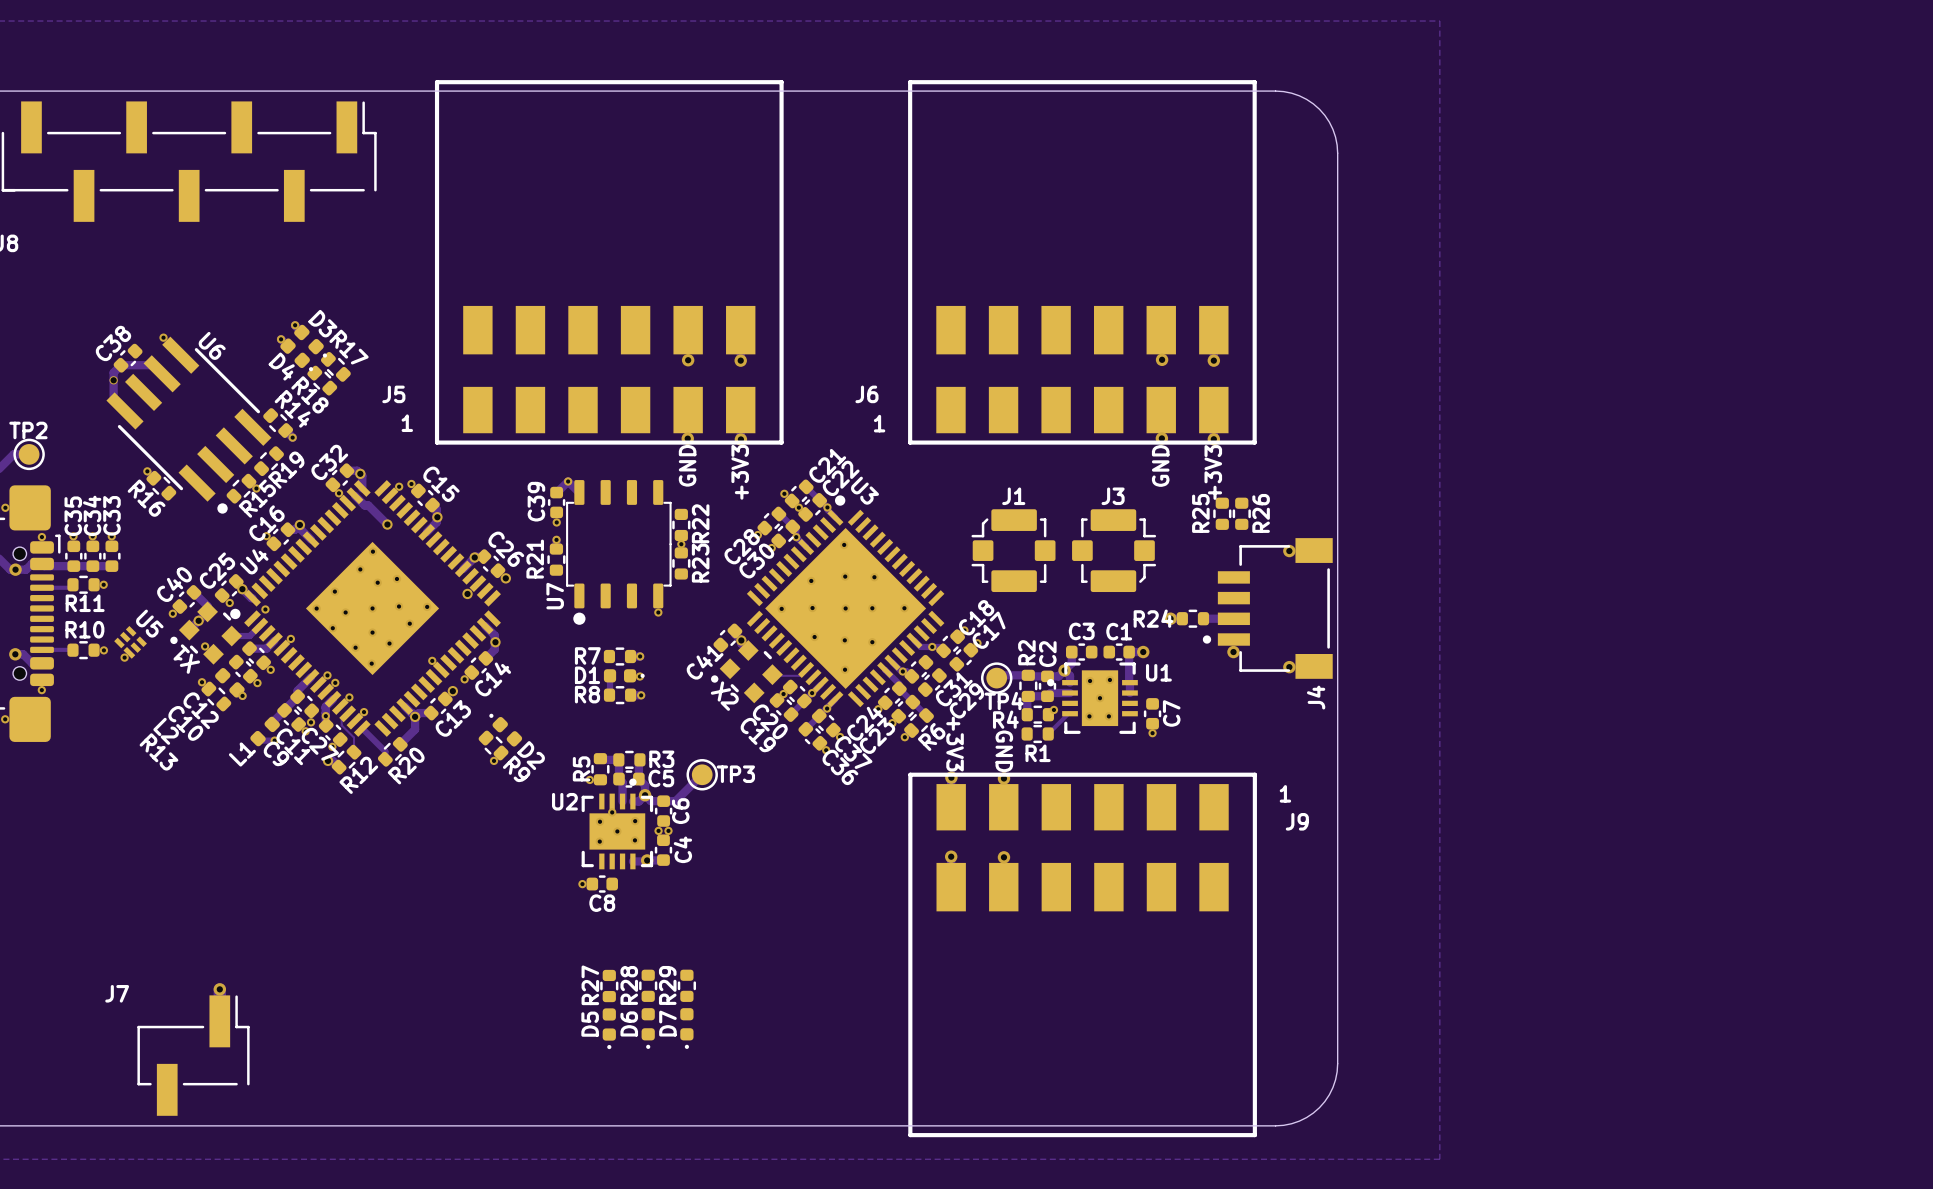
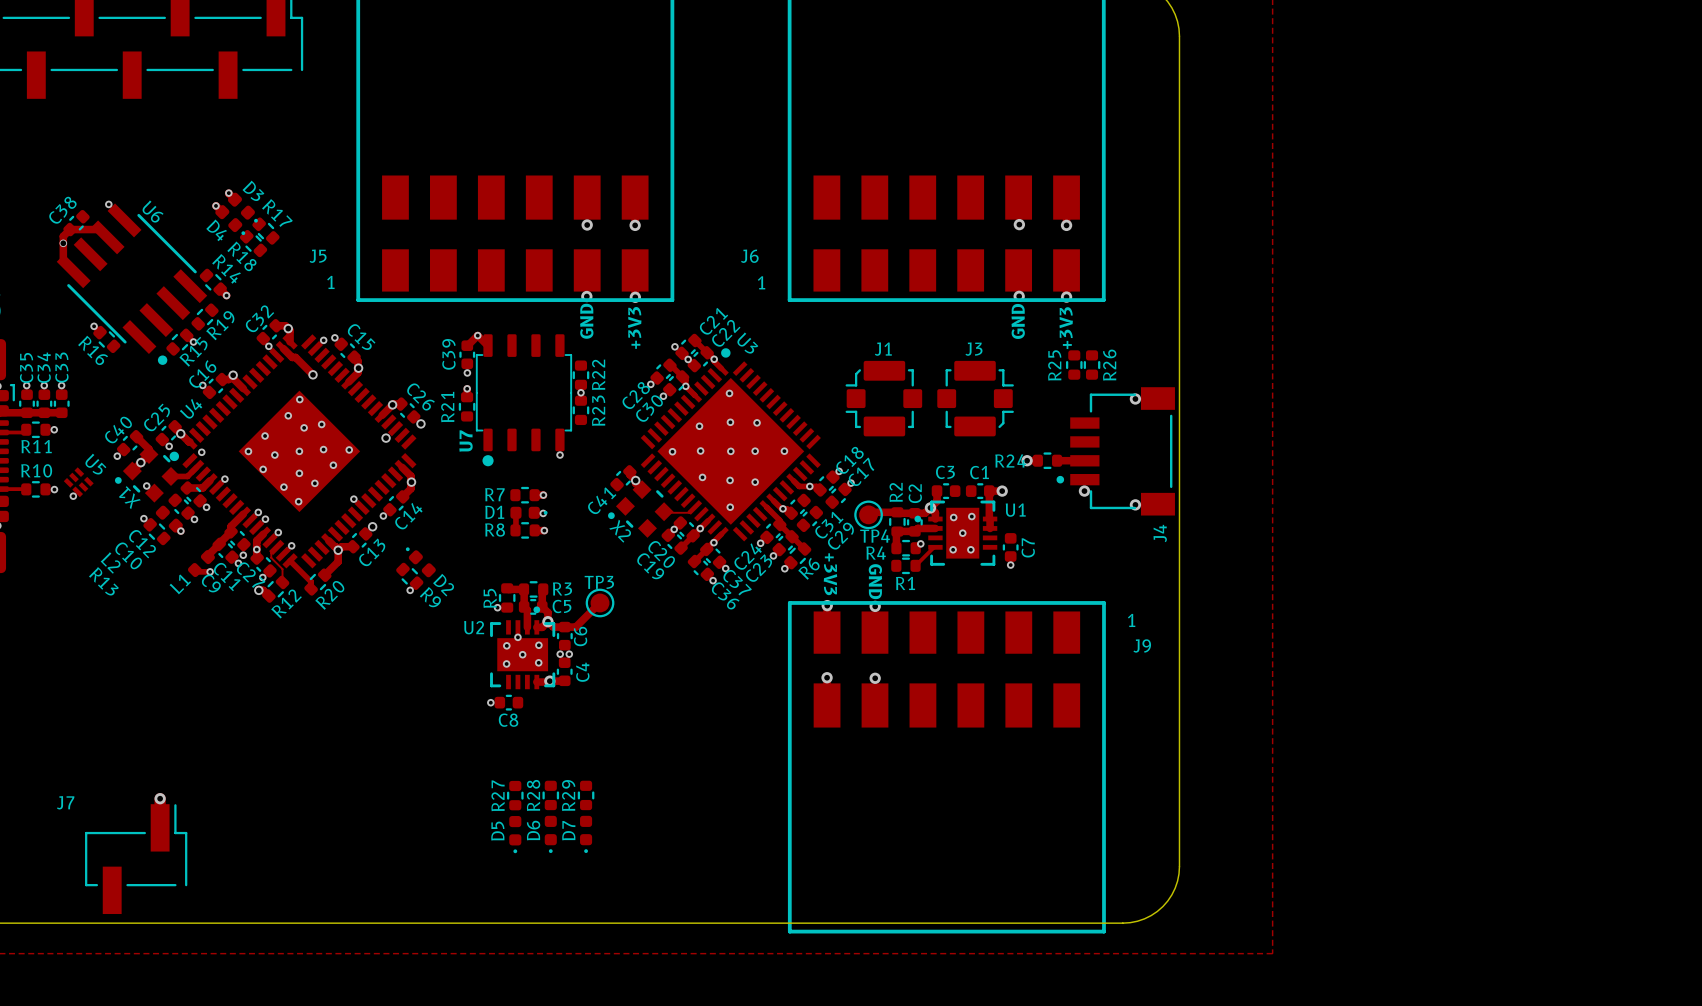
TP3 name position: TP3 (735, 774) -> TP3 (599, 582)

